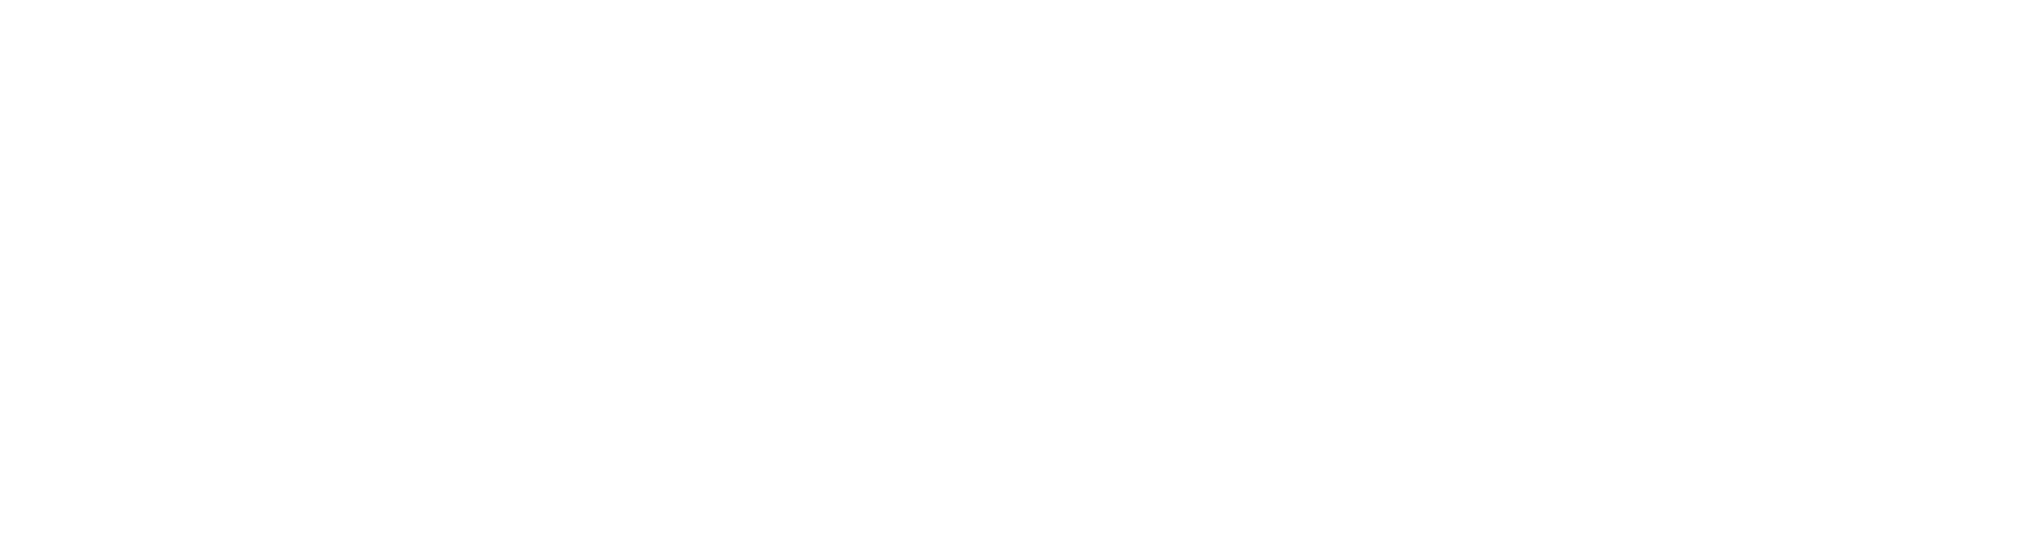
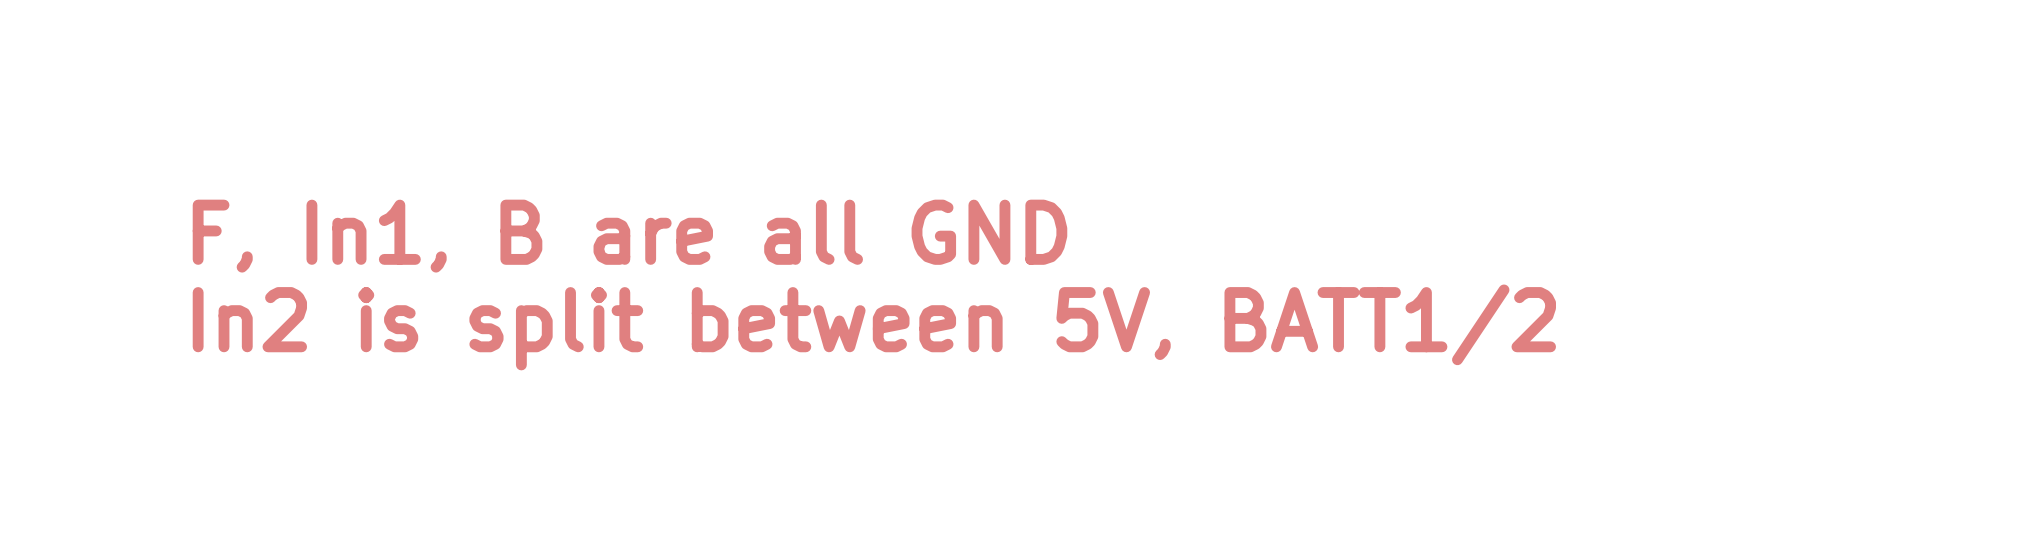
text: none -> F, In1, B are all GND (629, 236)
text: none -> In2 is split between 5V, BATT1/2 (874, 327)

